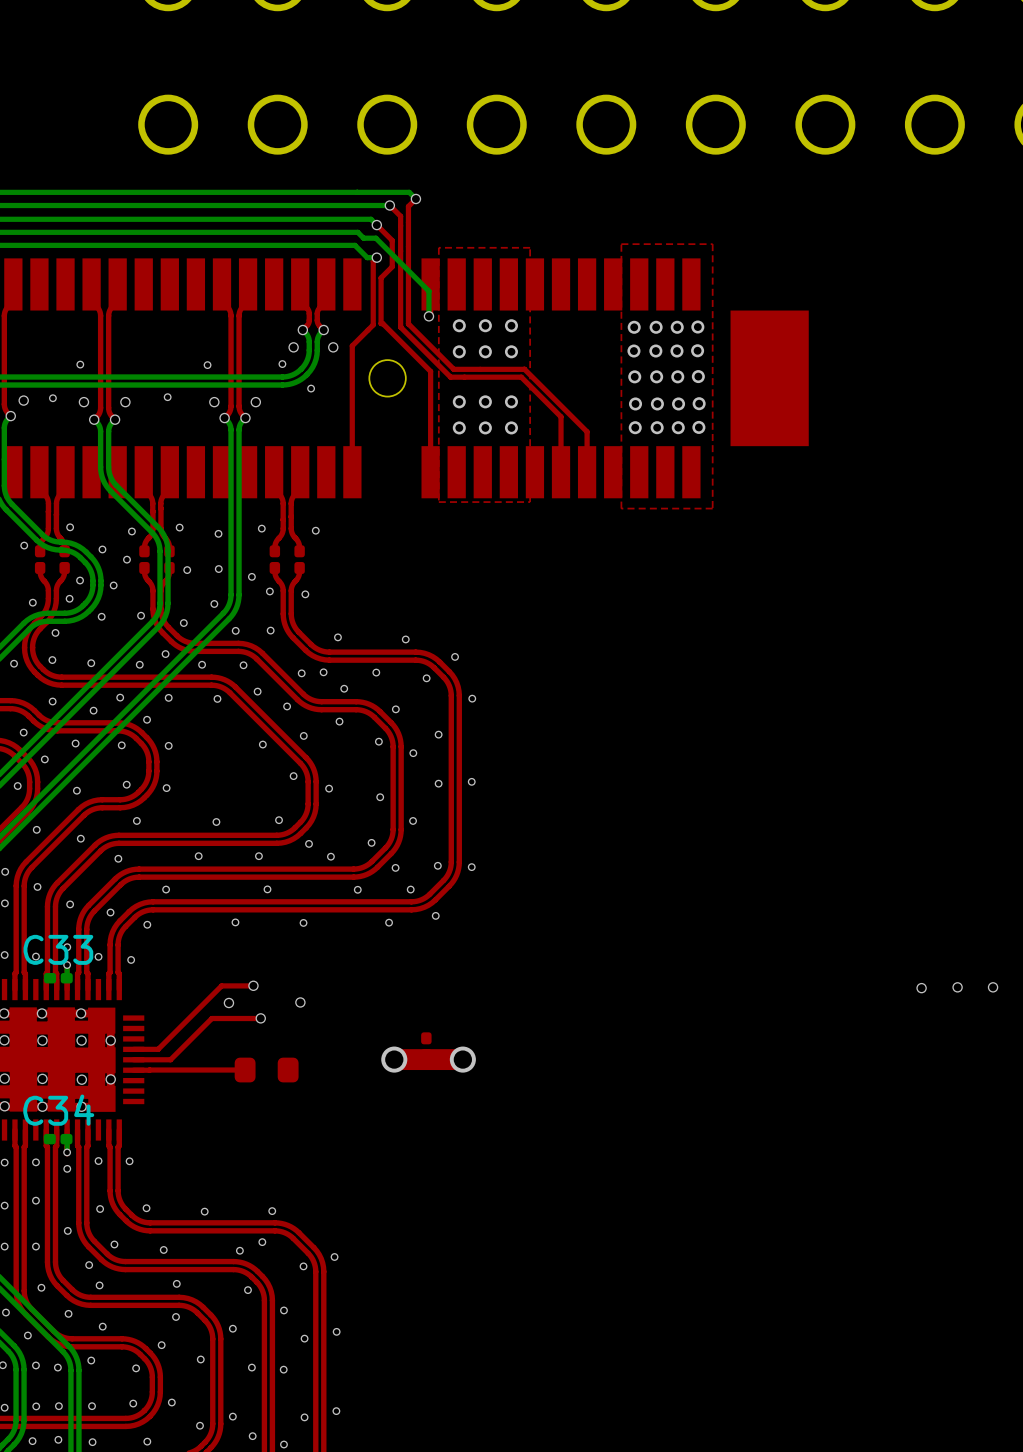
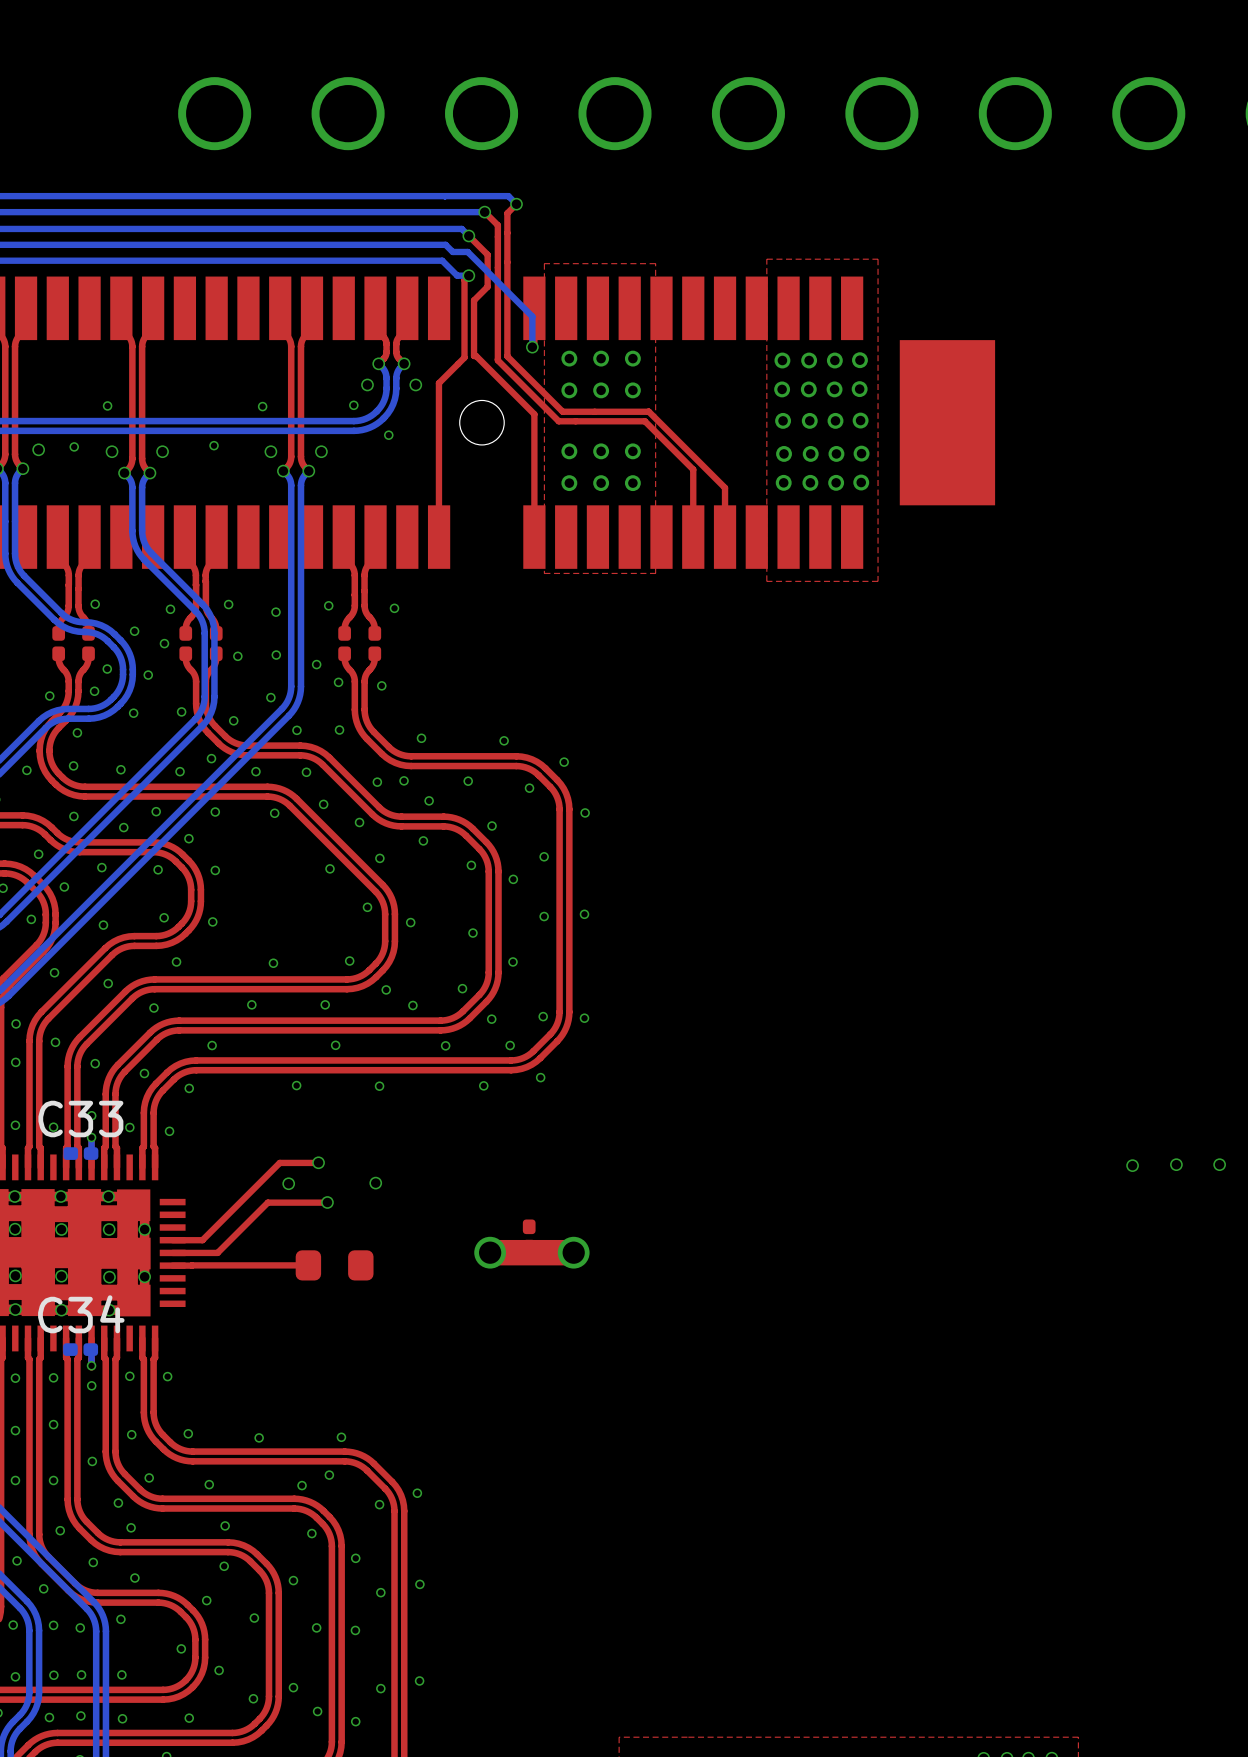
via: (24, 545) -> none
via: (136, 1368) -> none
via: none -> (181, 1648)
via: (133, 1403) -> none

